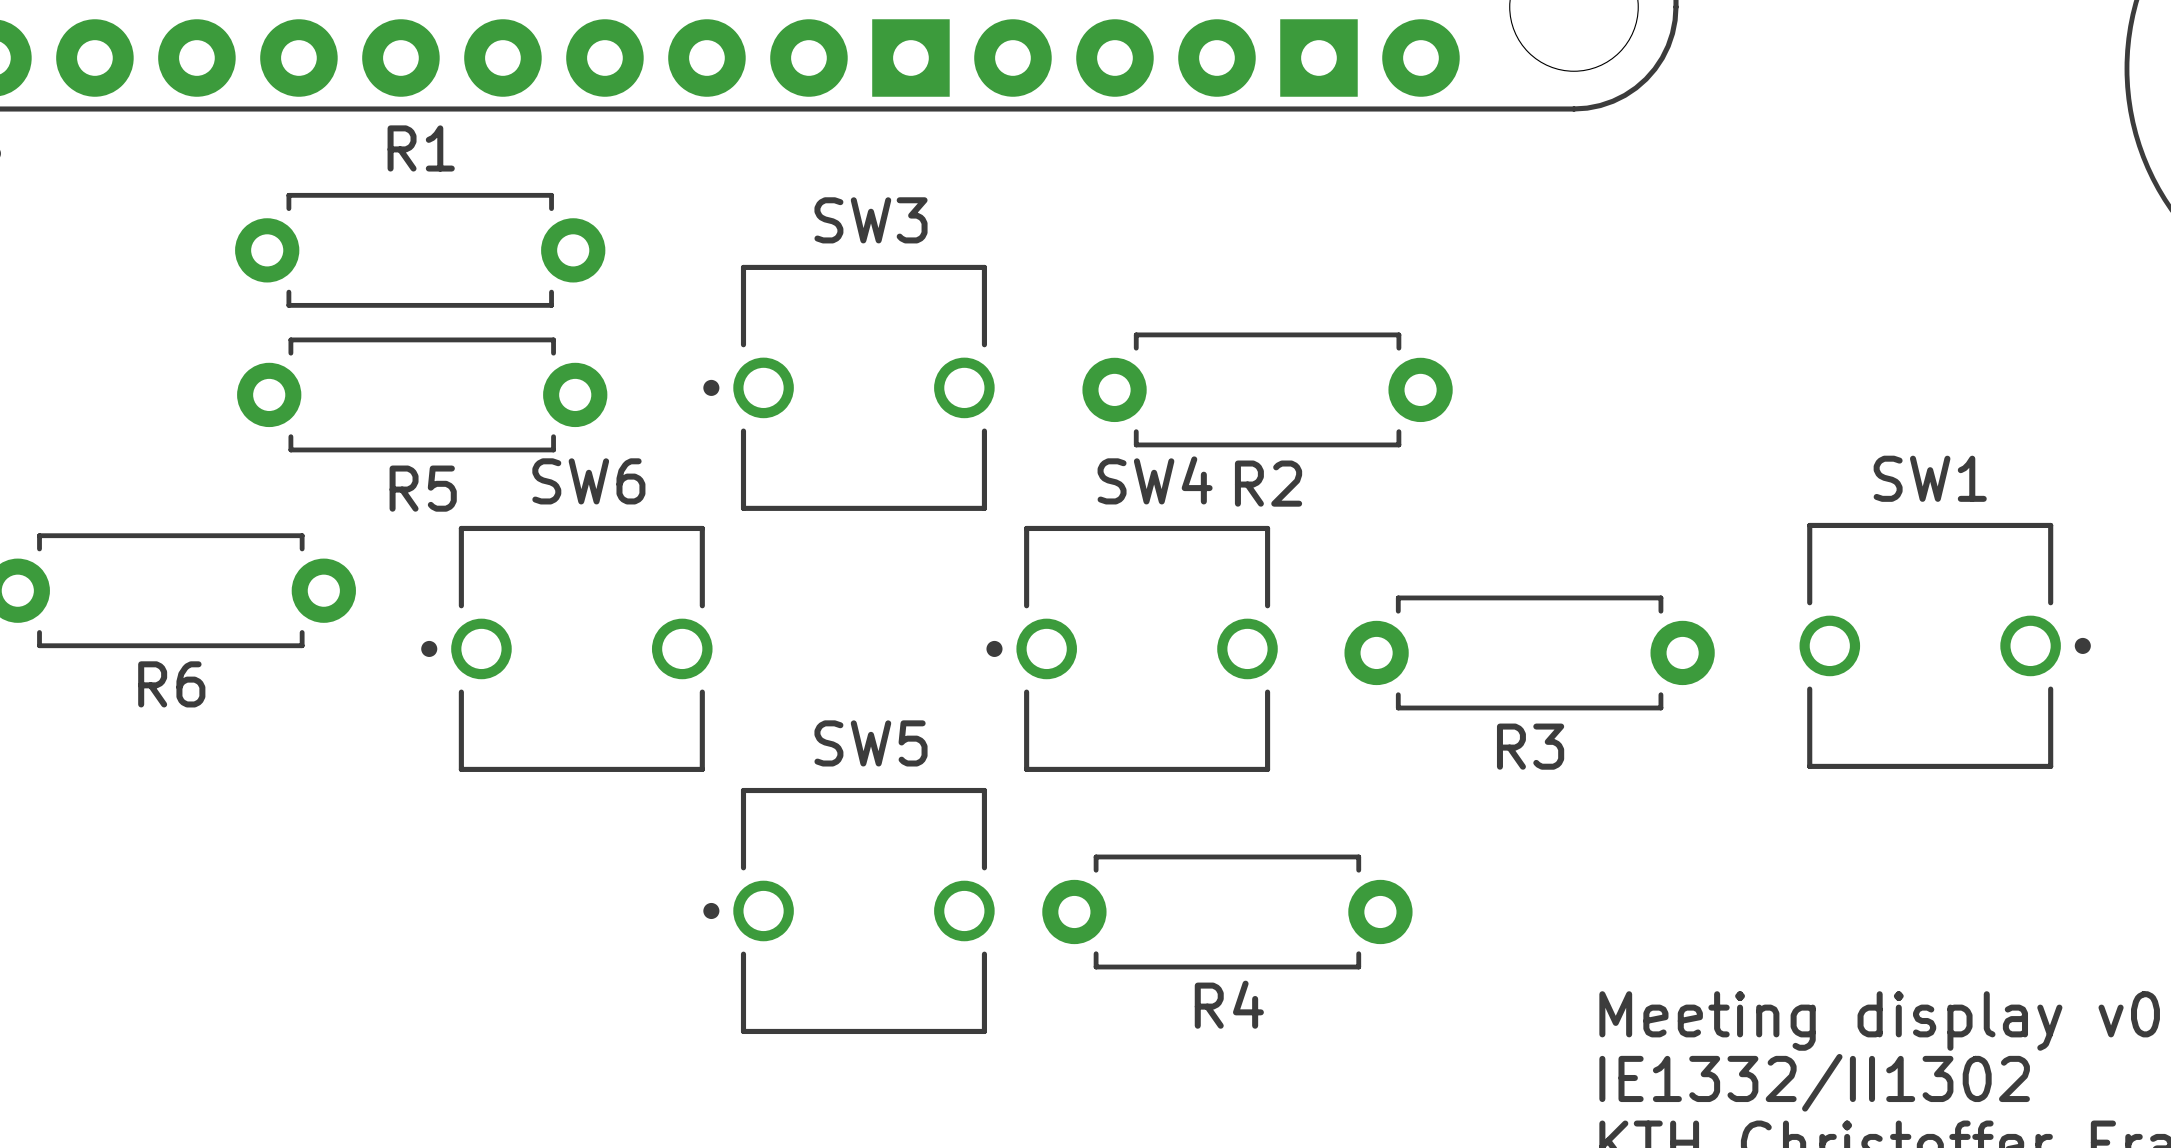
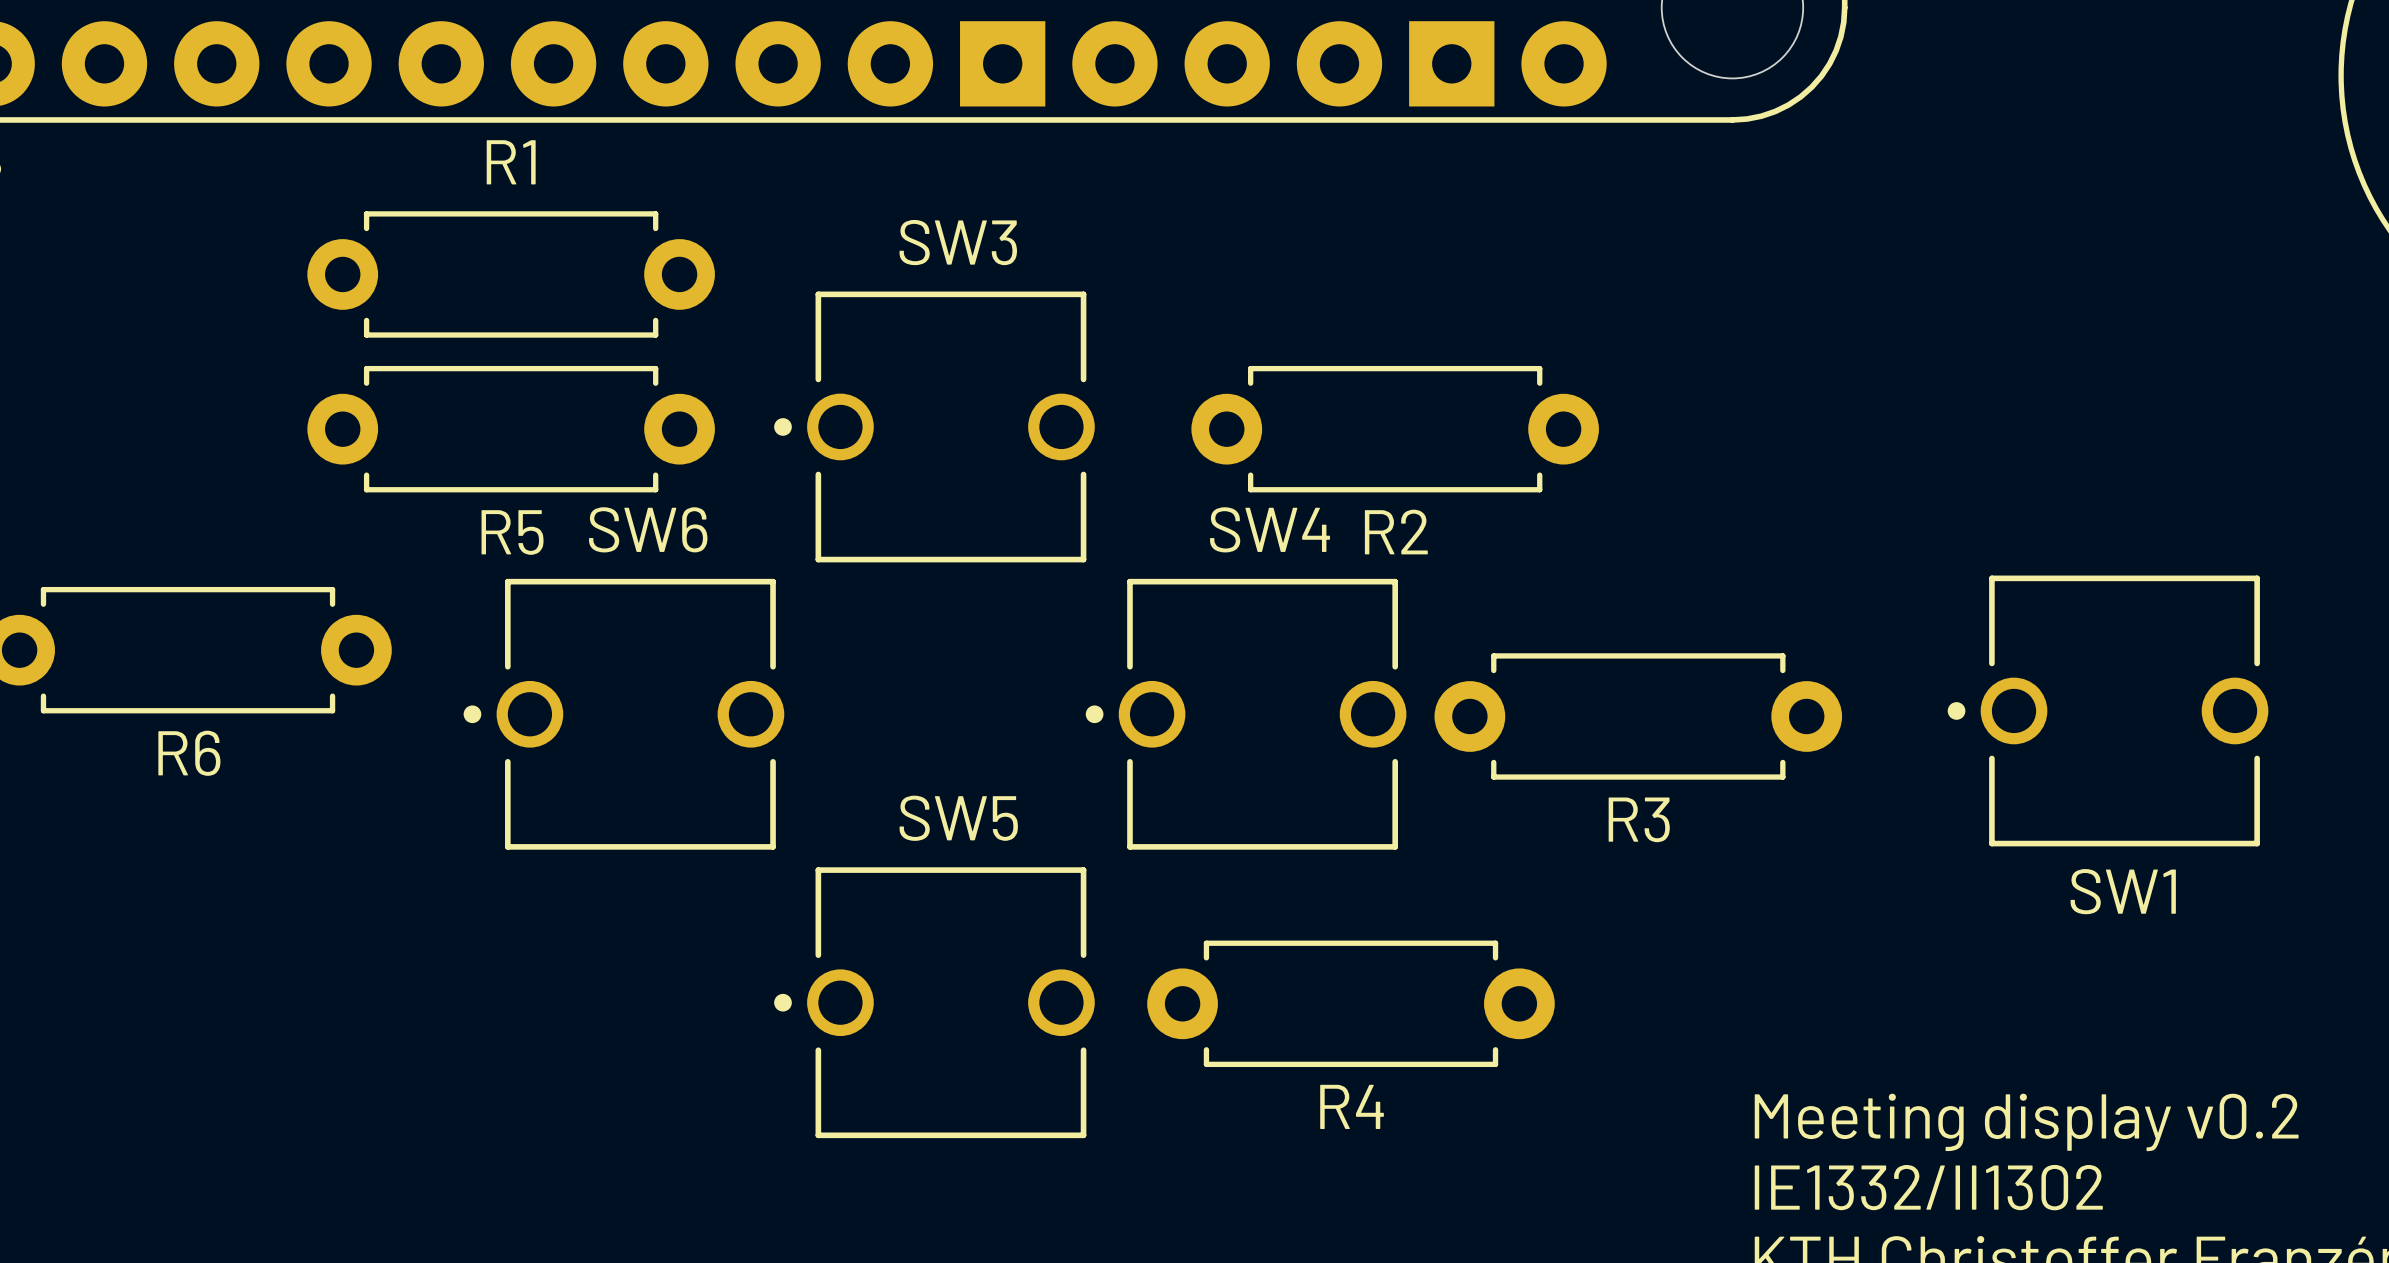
R1 position: (420, 250) -> (511, 274)
R5 position: (422, 394) -> (511, 429)
SW1 rotation: 0° (1945, 645) -> 180° (2108, 710)
R3 position: (1529, 652) -> (1638, 716)

